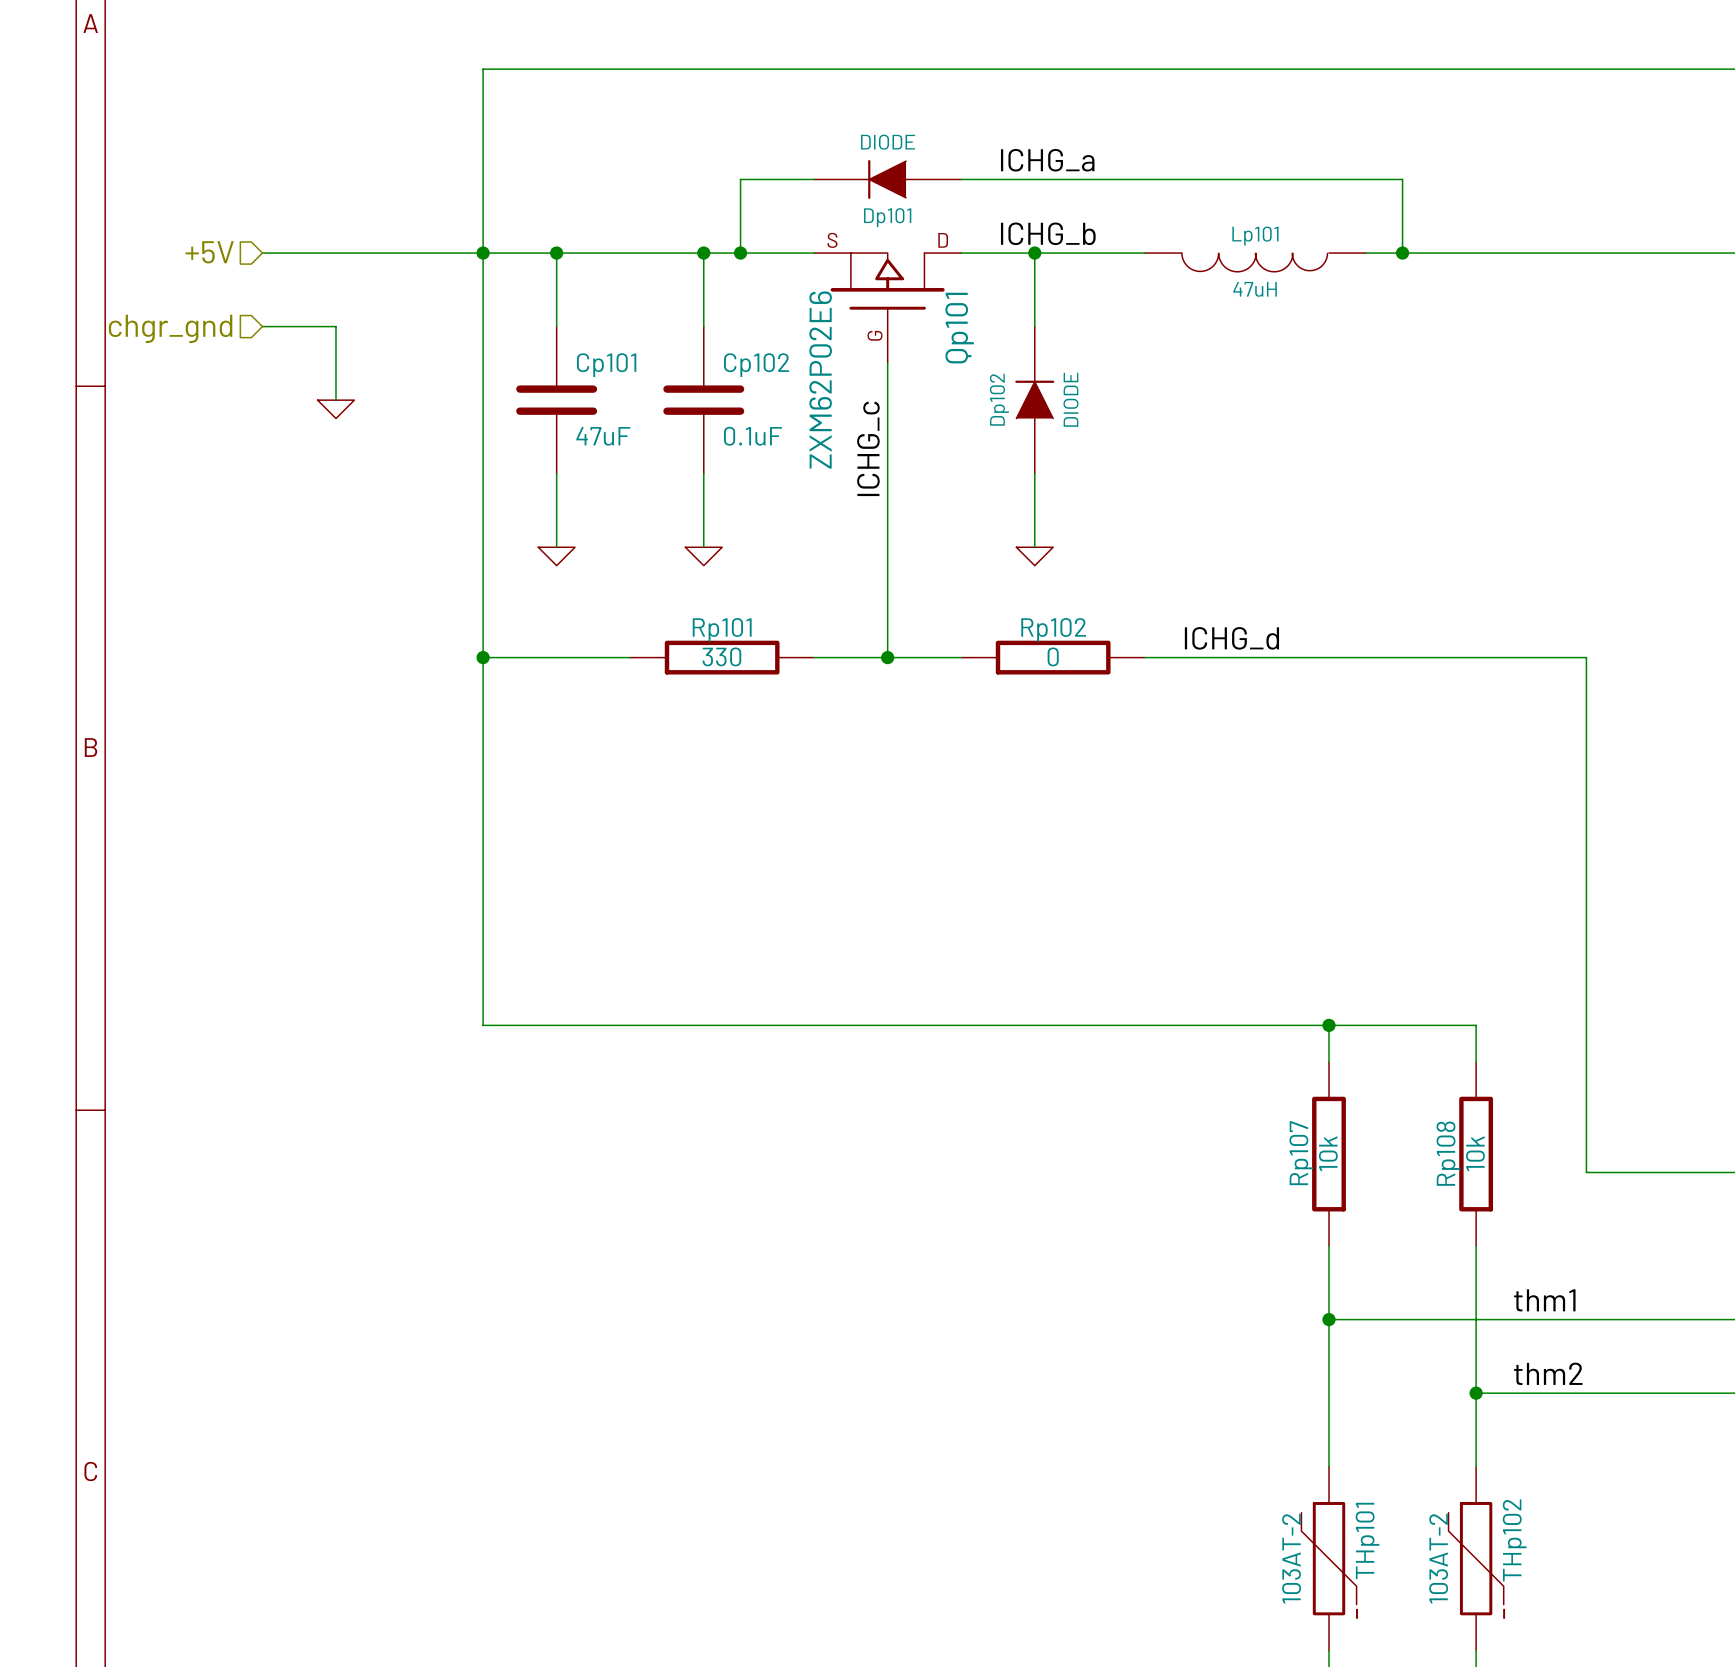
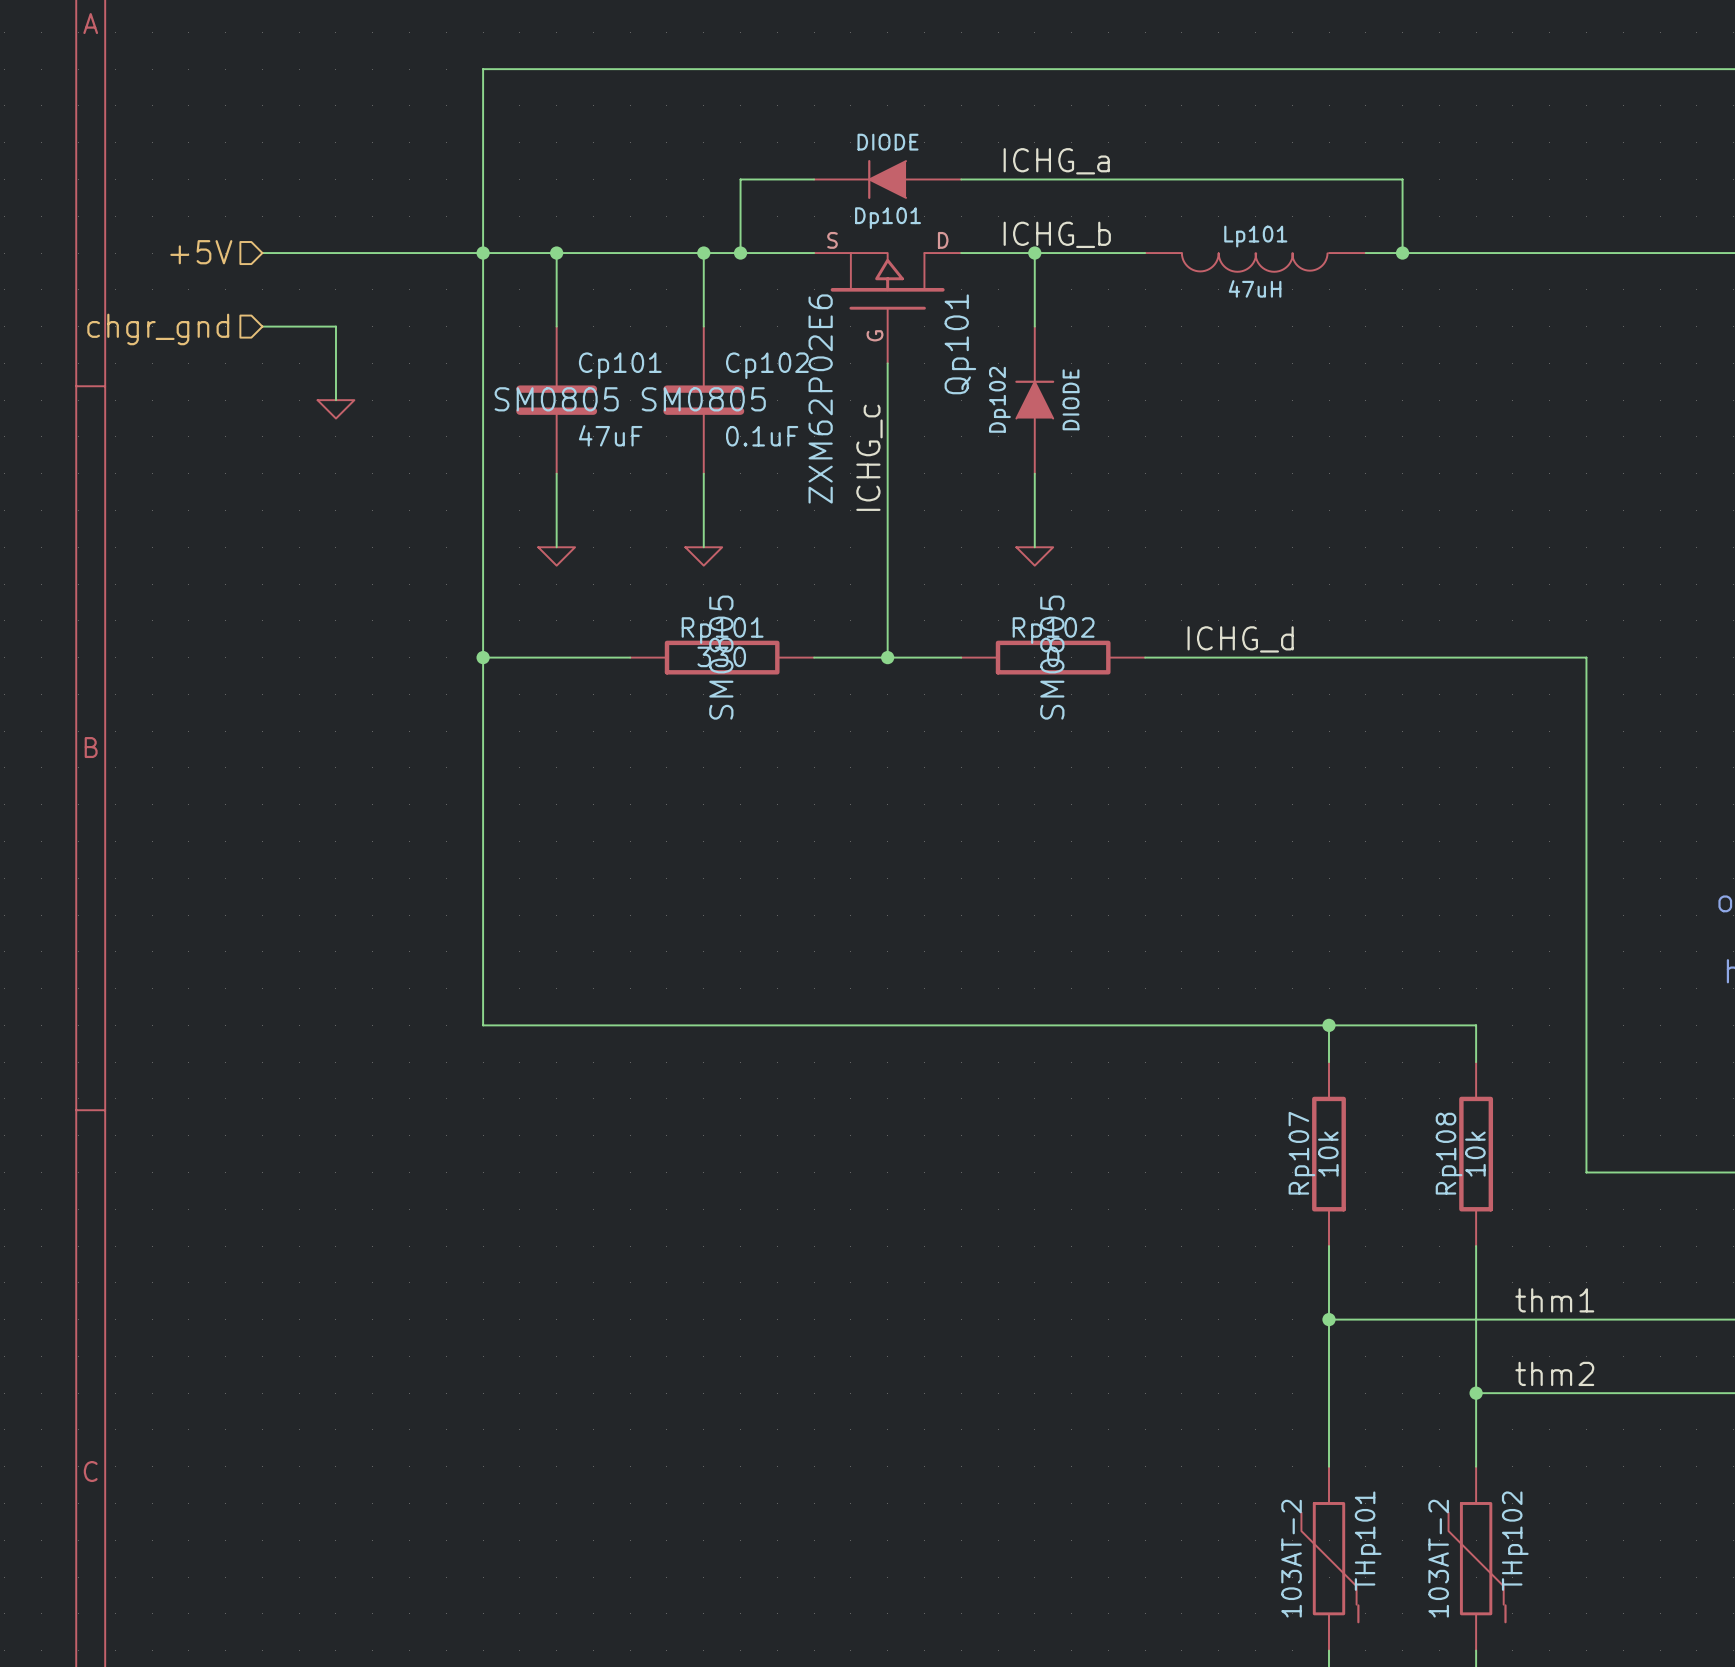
Cp101 text: none -> SM0805 (556, 399)
Cp102 text: none -> SM0805 (703, 399)
Rp101 text: none -> SM0805 (721, 657)
Rp102 text: none -> SM0805 (1052, 657)

